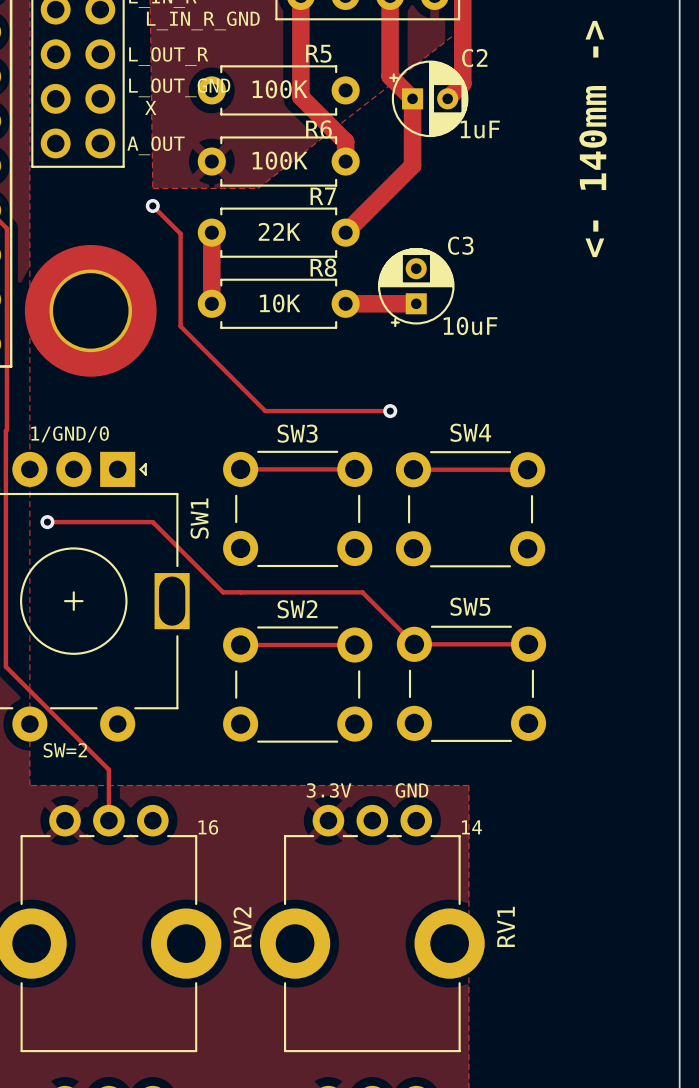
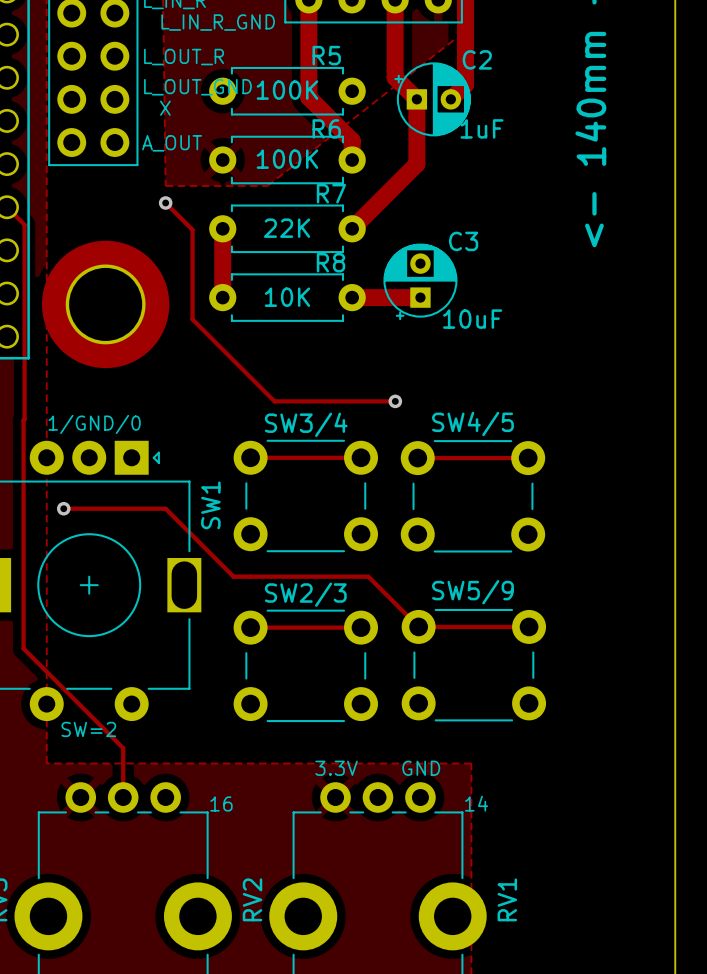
SW4 name: SW4 (470, 432) -> SW4/5 (472, 423)
SW3 name: SW3 (297, 433) -> SW3/4 (306, 424)
SW5 name: SW5 (470, 606) -> SW5/9 (472, 592)
SW2 name: SW2 (297, 609) -> SW2/3 (305, 594)

